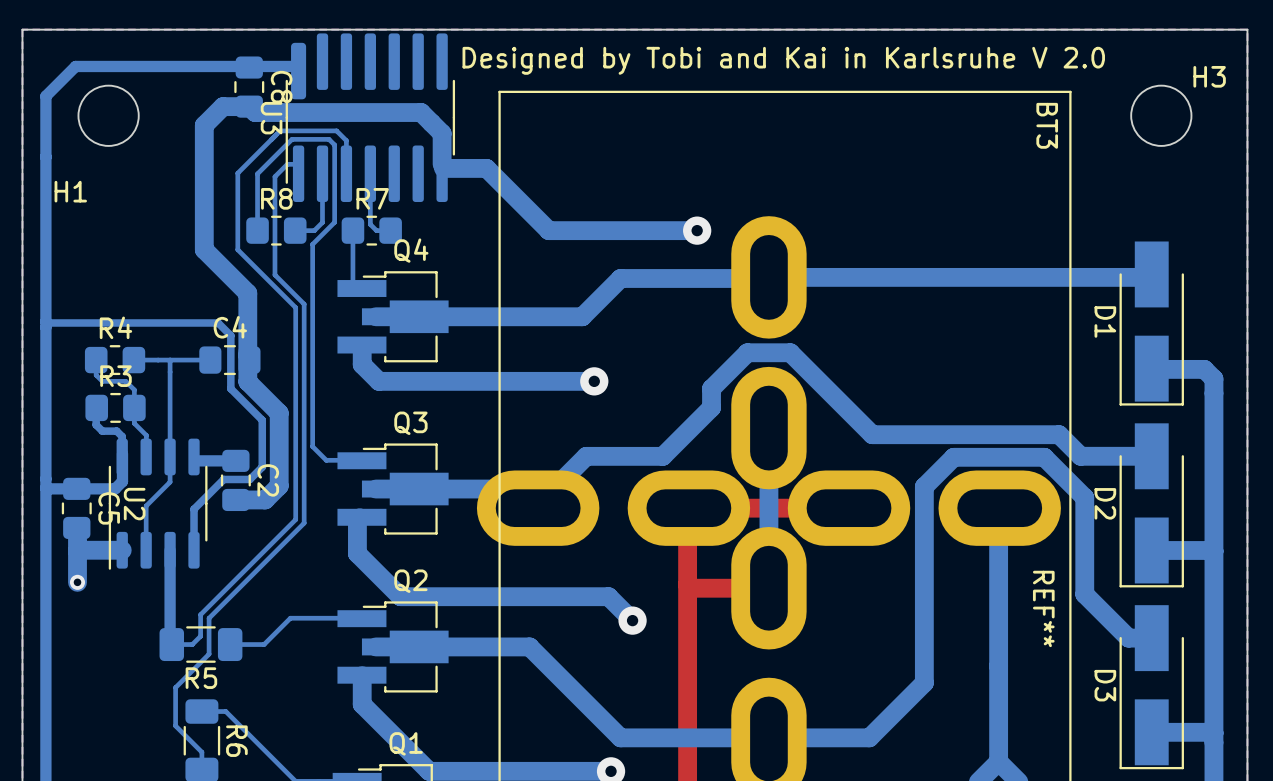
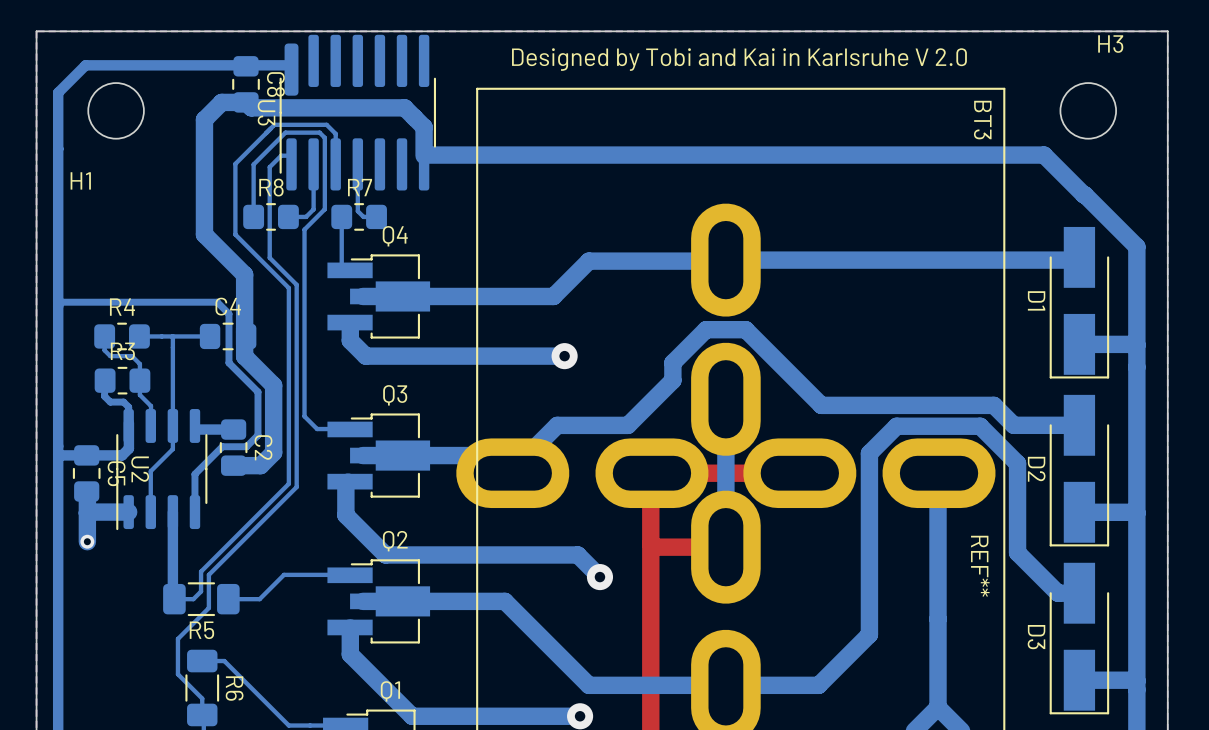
H3 name position: H3 (1209, 76) -> H3 (1110, 44)
bottom track: (443, 168) (486, 168) (548, 230) (697, 230) -> none
via: (697, 230) -> none
bottom track: none -> (1079, 344) (1136, 345)
bottom track: (1151, 369) (1204, 369) (1213, 378) -> (425, 155) (1044, 155) (1136, 246) (1136, 353)

